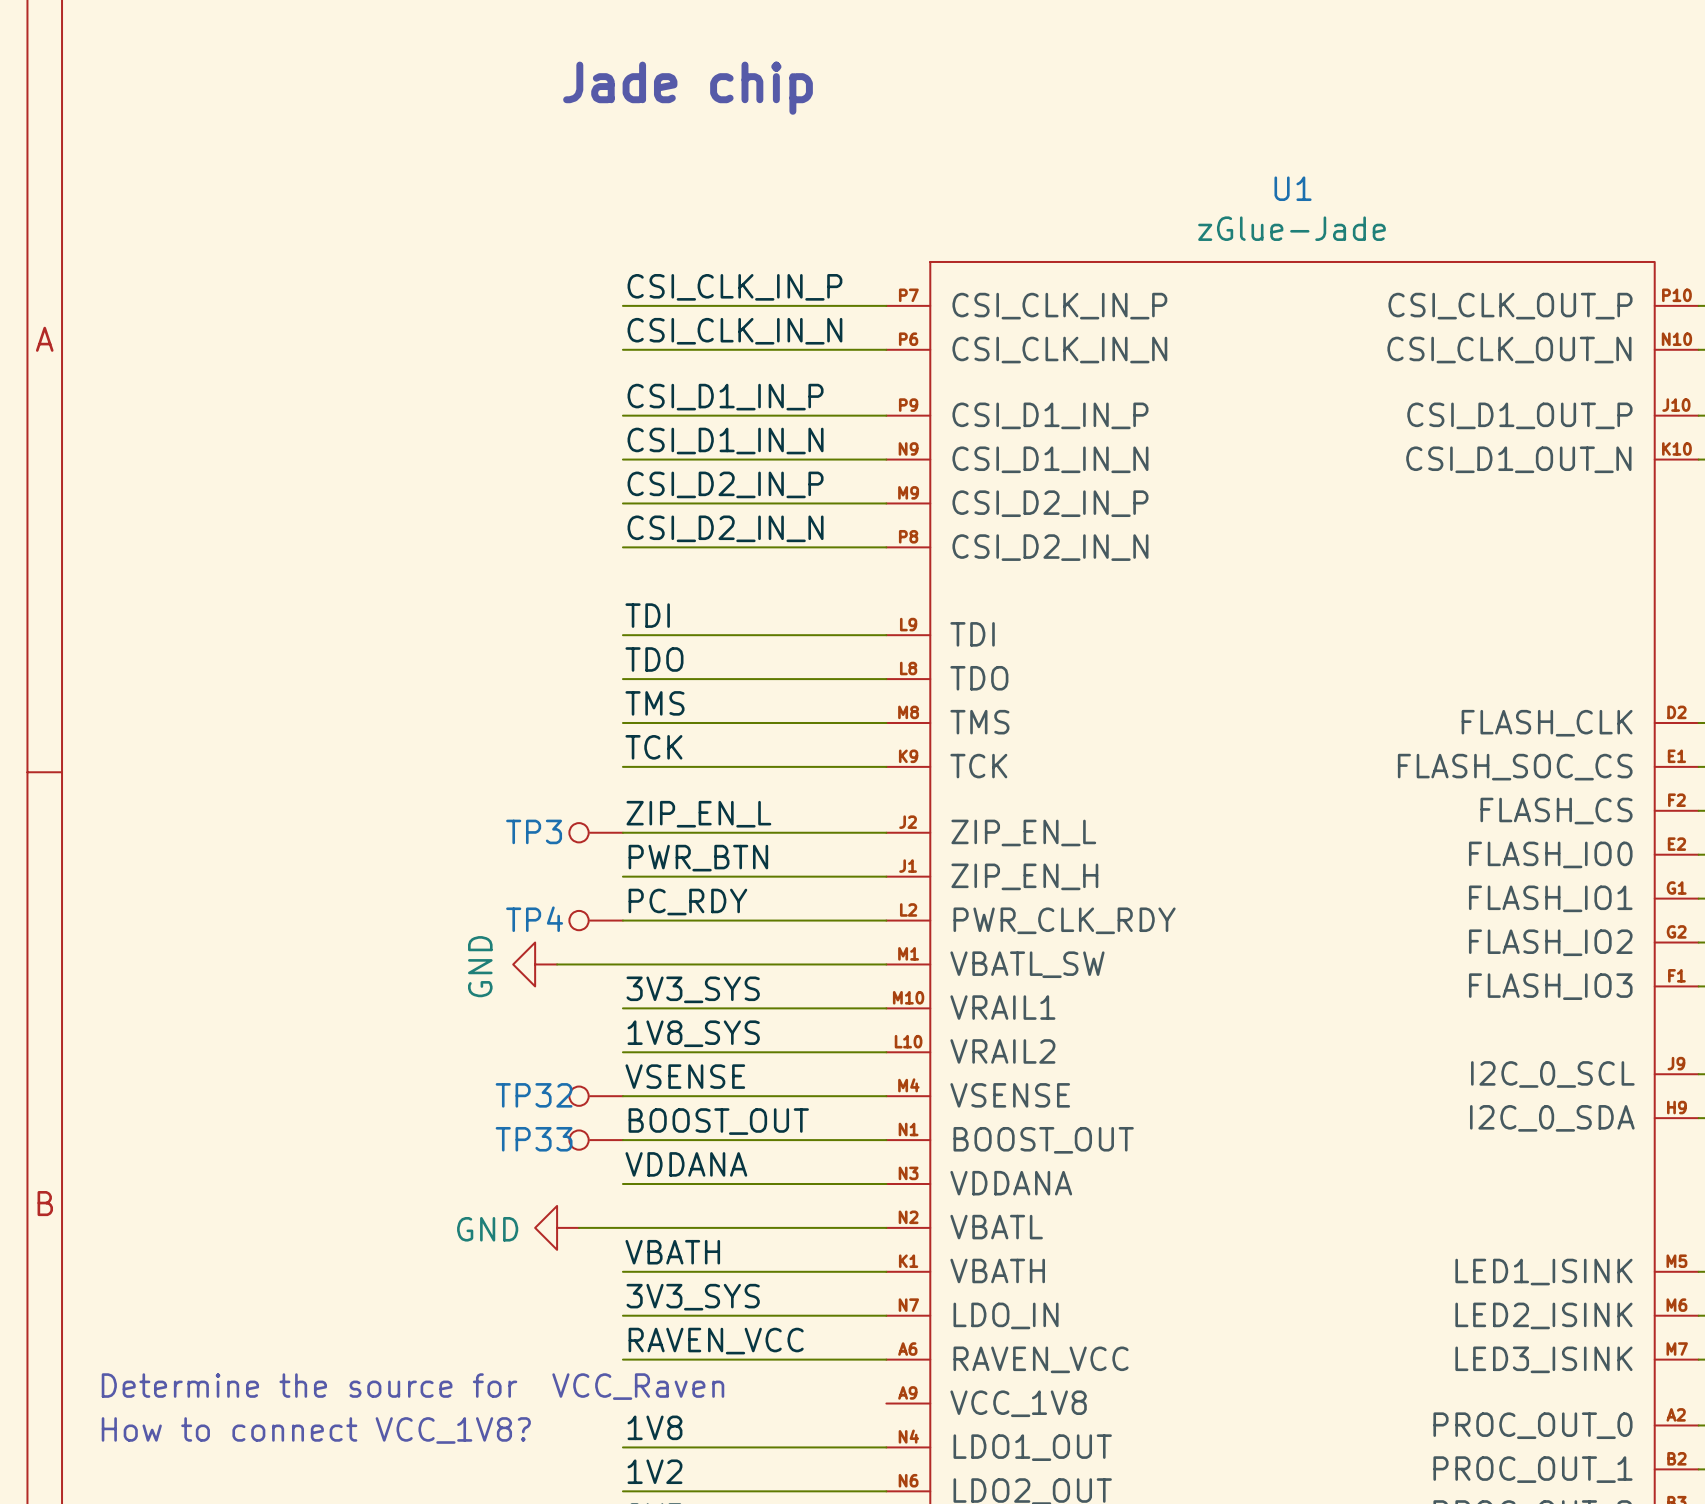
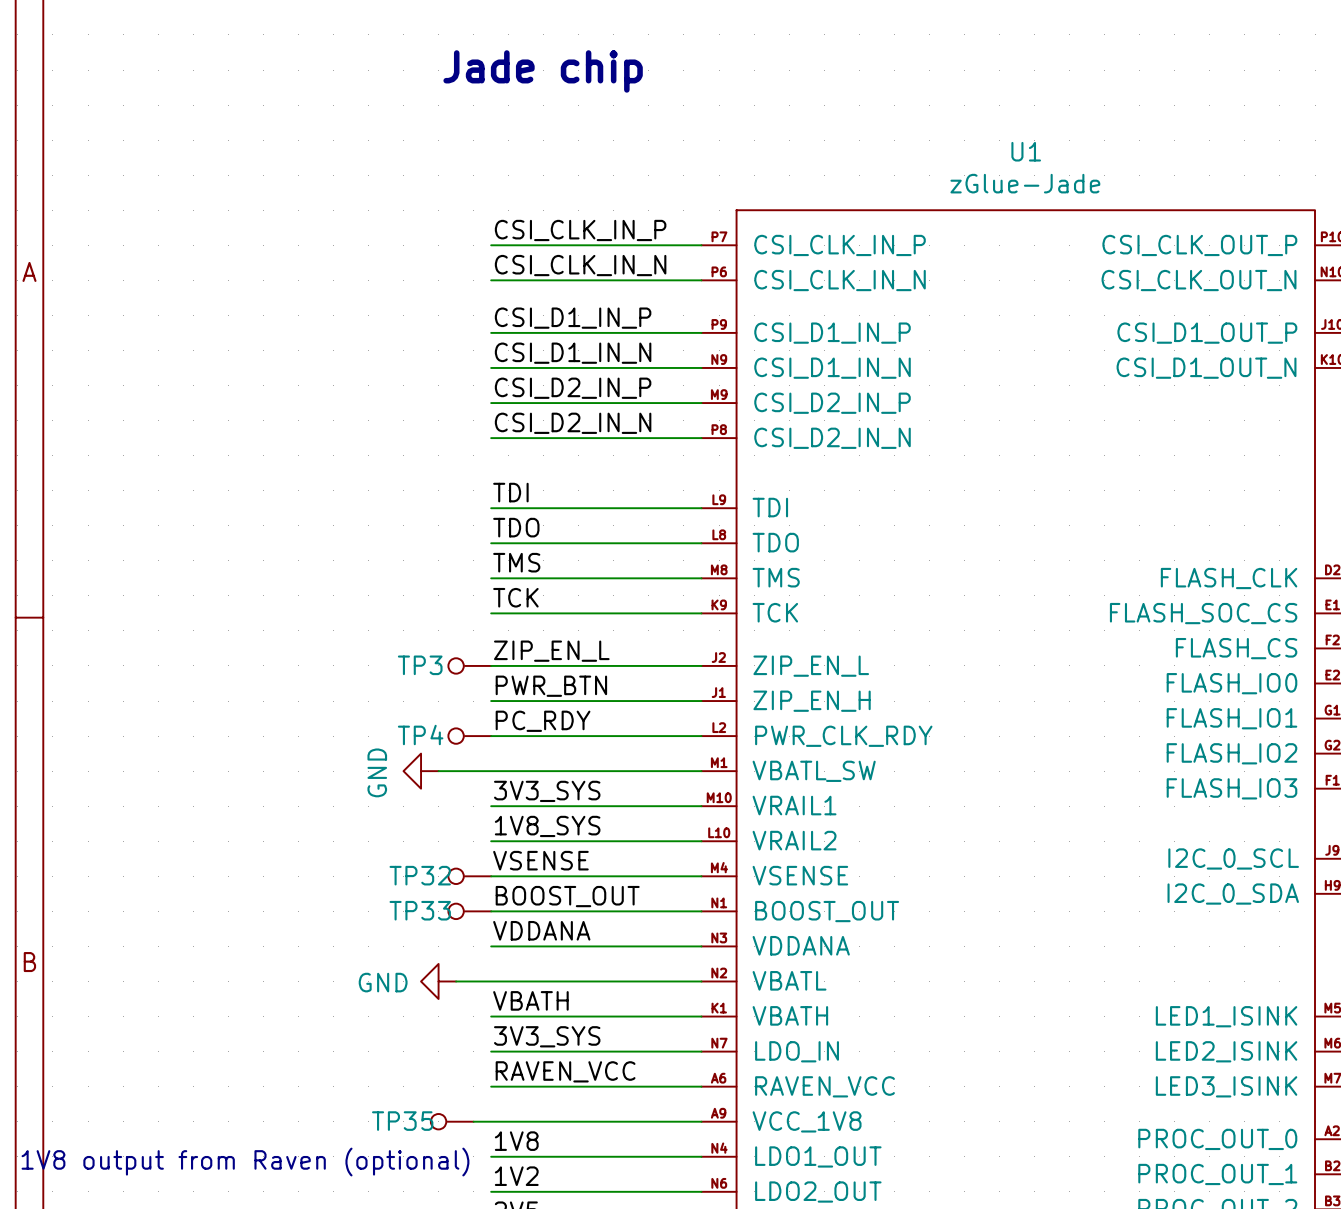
text: Determine the source for VCC_Raven (412, 1386) -> none
TP35: none -> (452, 1121)
wire: none -> (473, 1121) (701, 1121)
text: How to connect VCC_1V8? (316, 1430) -> none
text: none -> 1V8 output from Raven (optional) (245, 1162)

